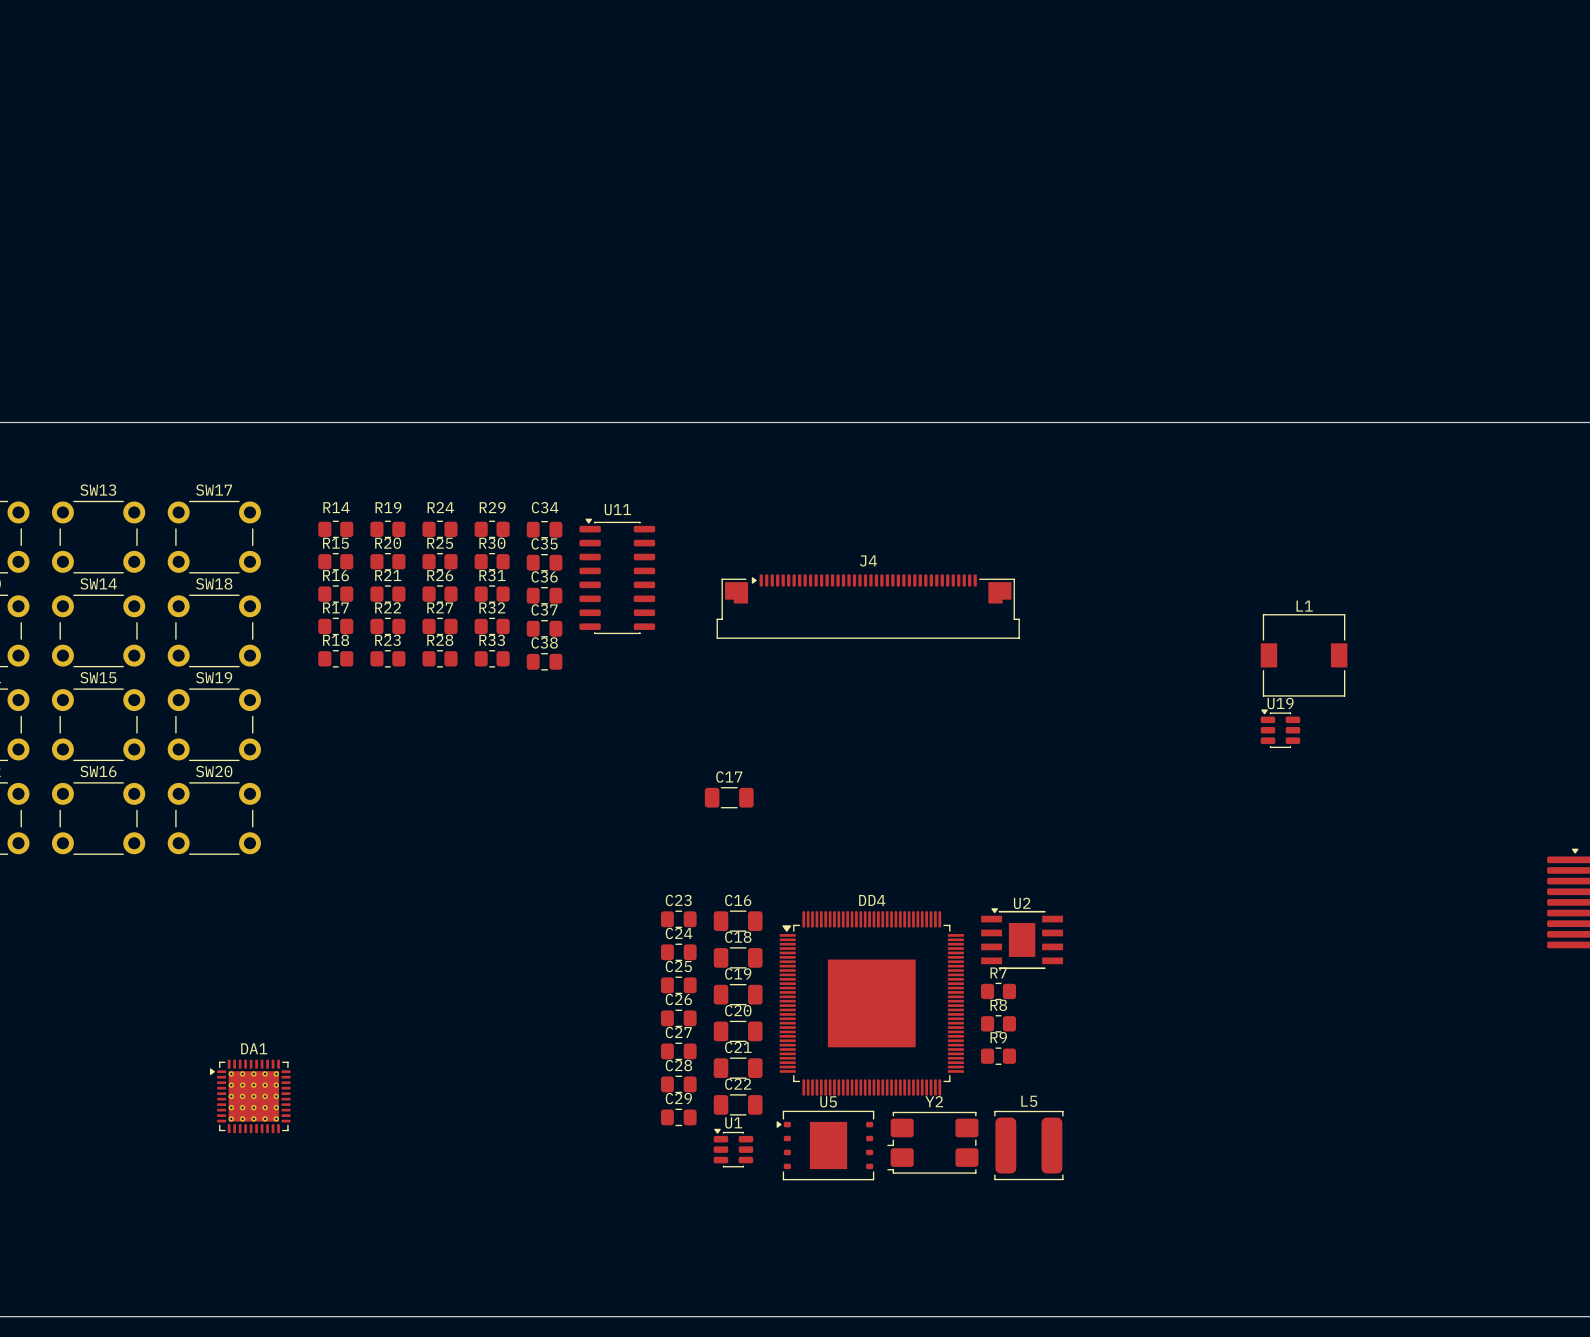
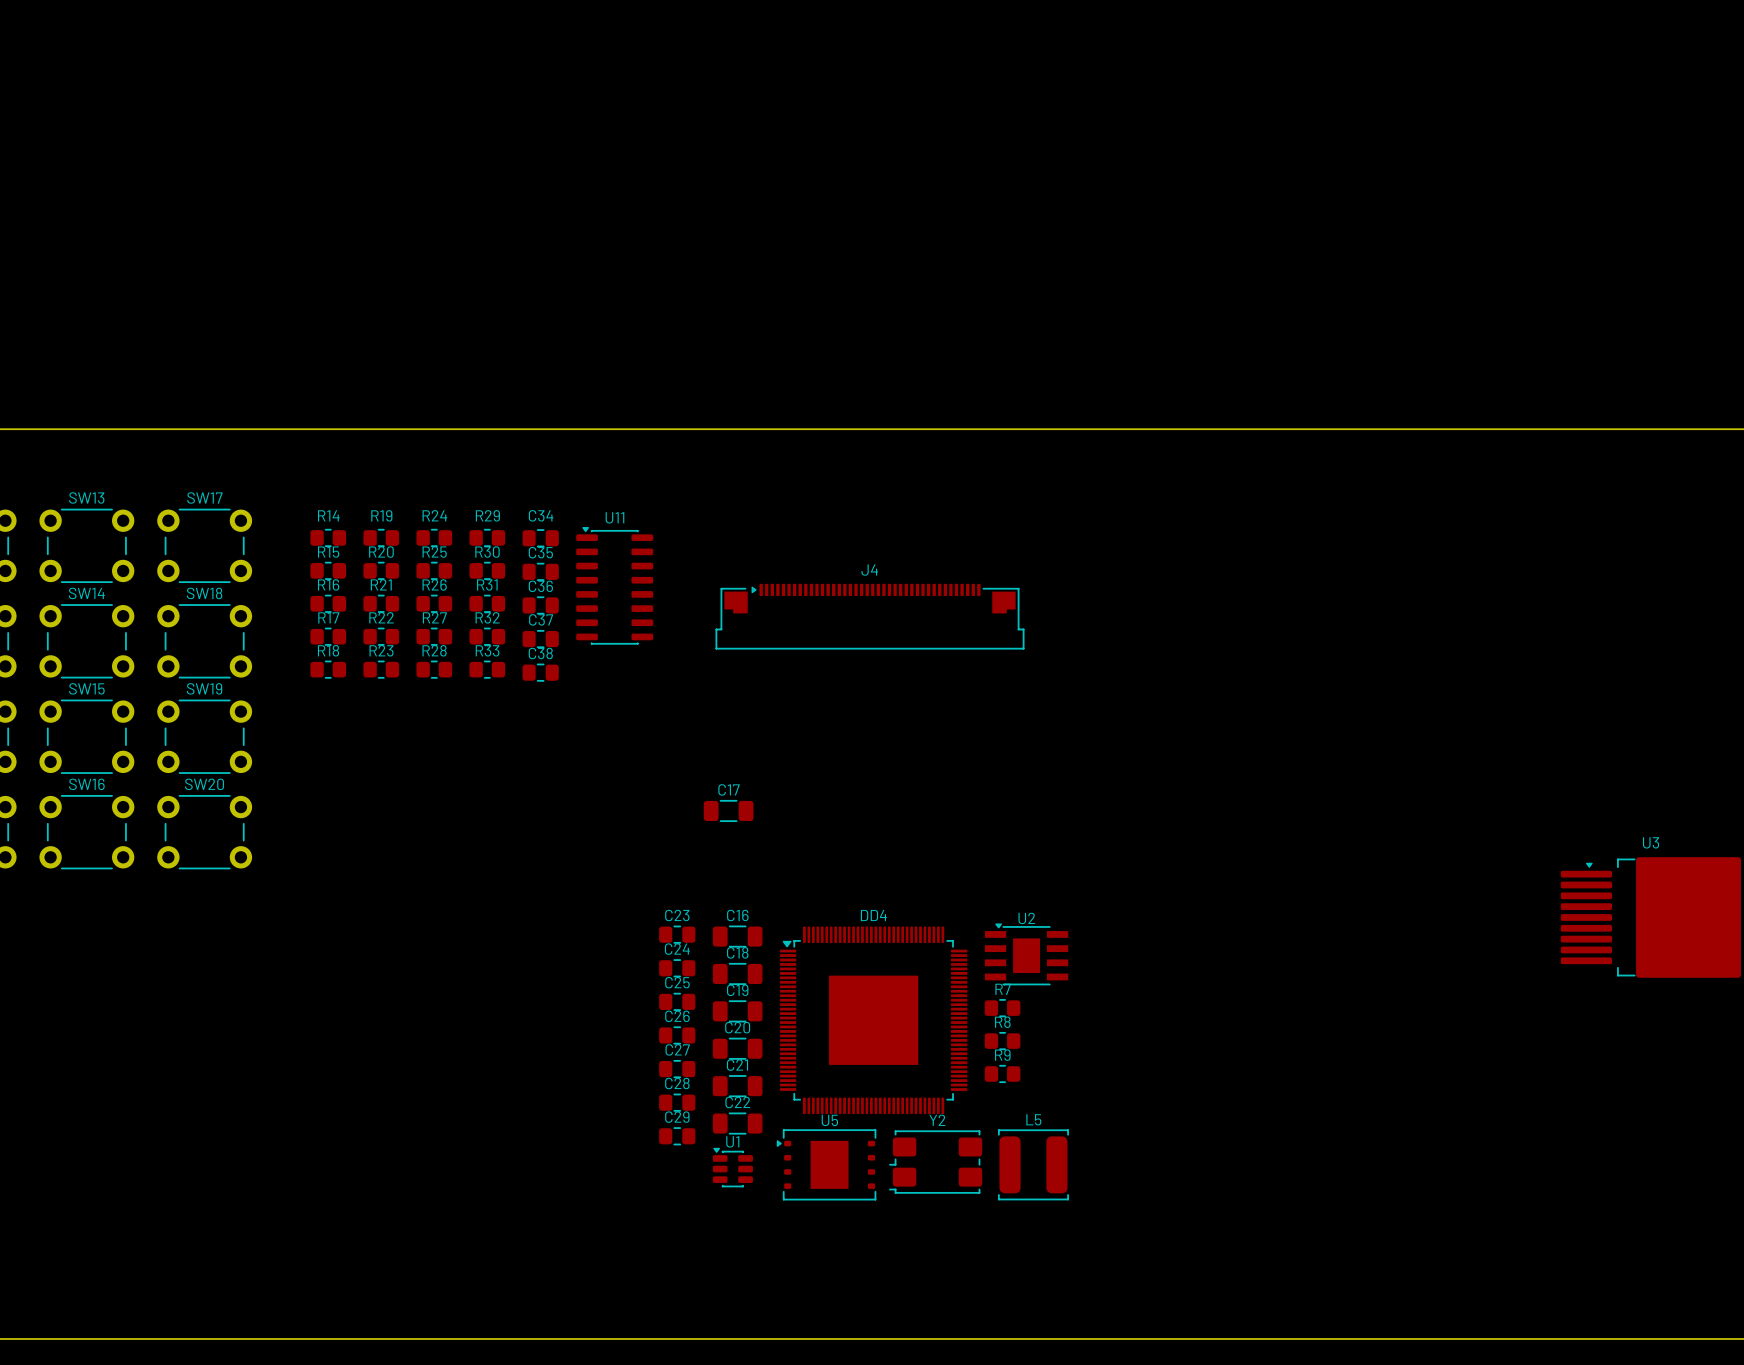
L1: (1304, 655) -> none
U19: (1280, 728) -> none
DA1: (250, 1096) -> none

